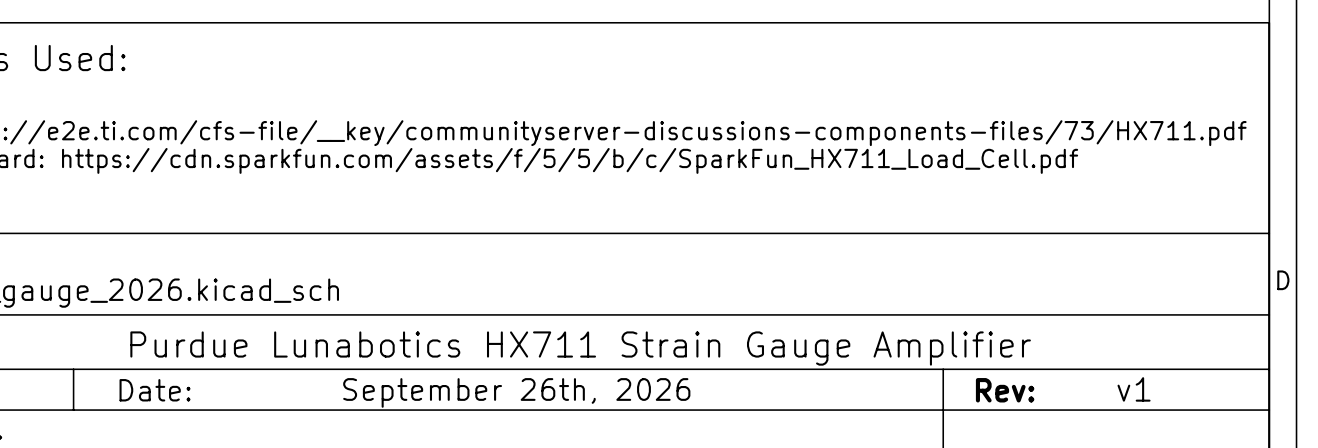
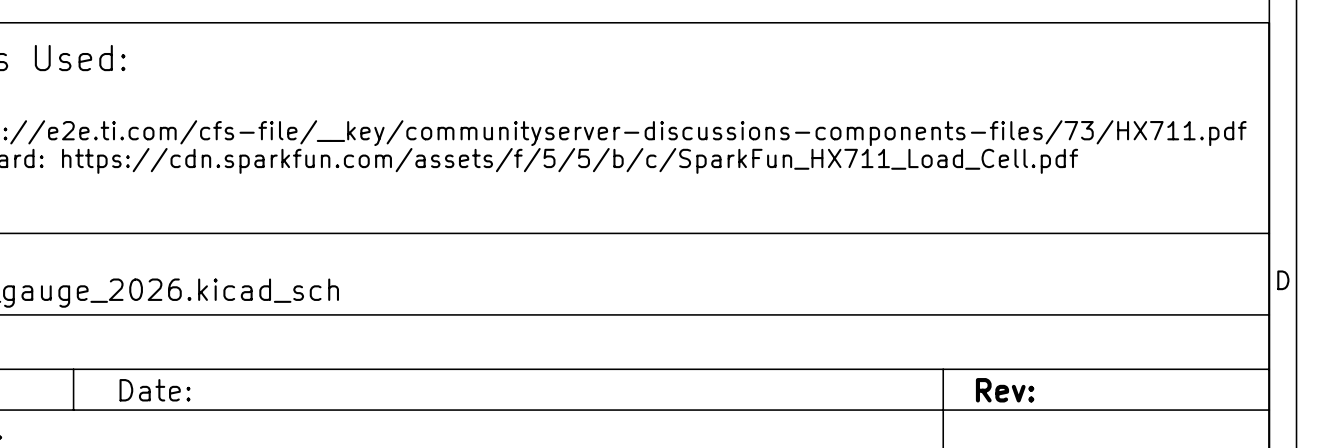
text: Purdue Lunabotics HX711 Strain Gauge Amplifier (580, 348) -> none
text: v1 (1134, 389) -> none
text: September 26th, 2026 (516, 392) -> none

